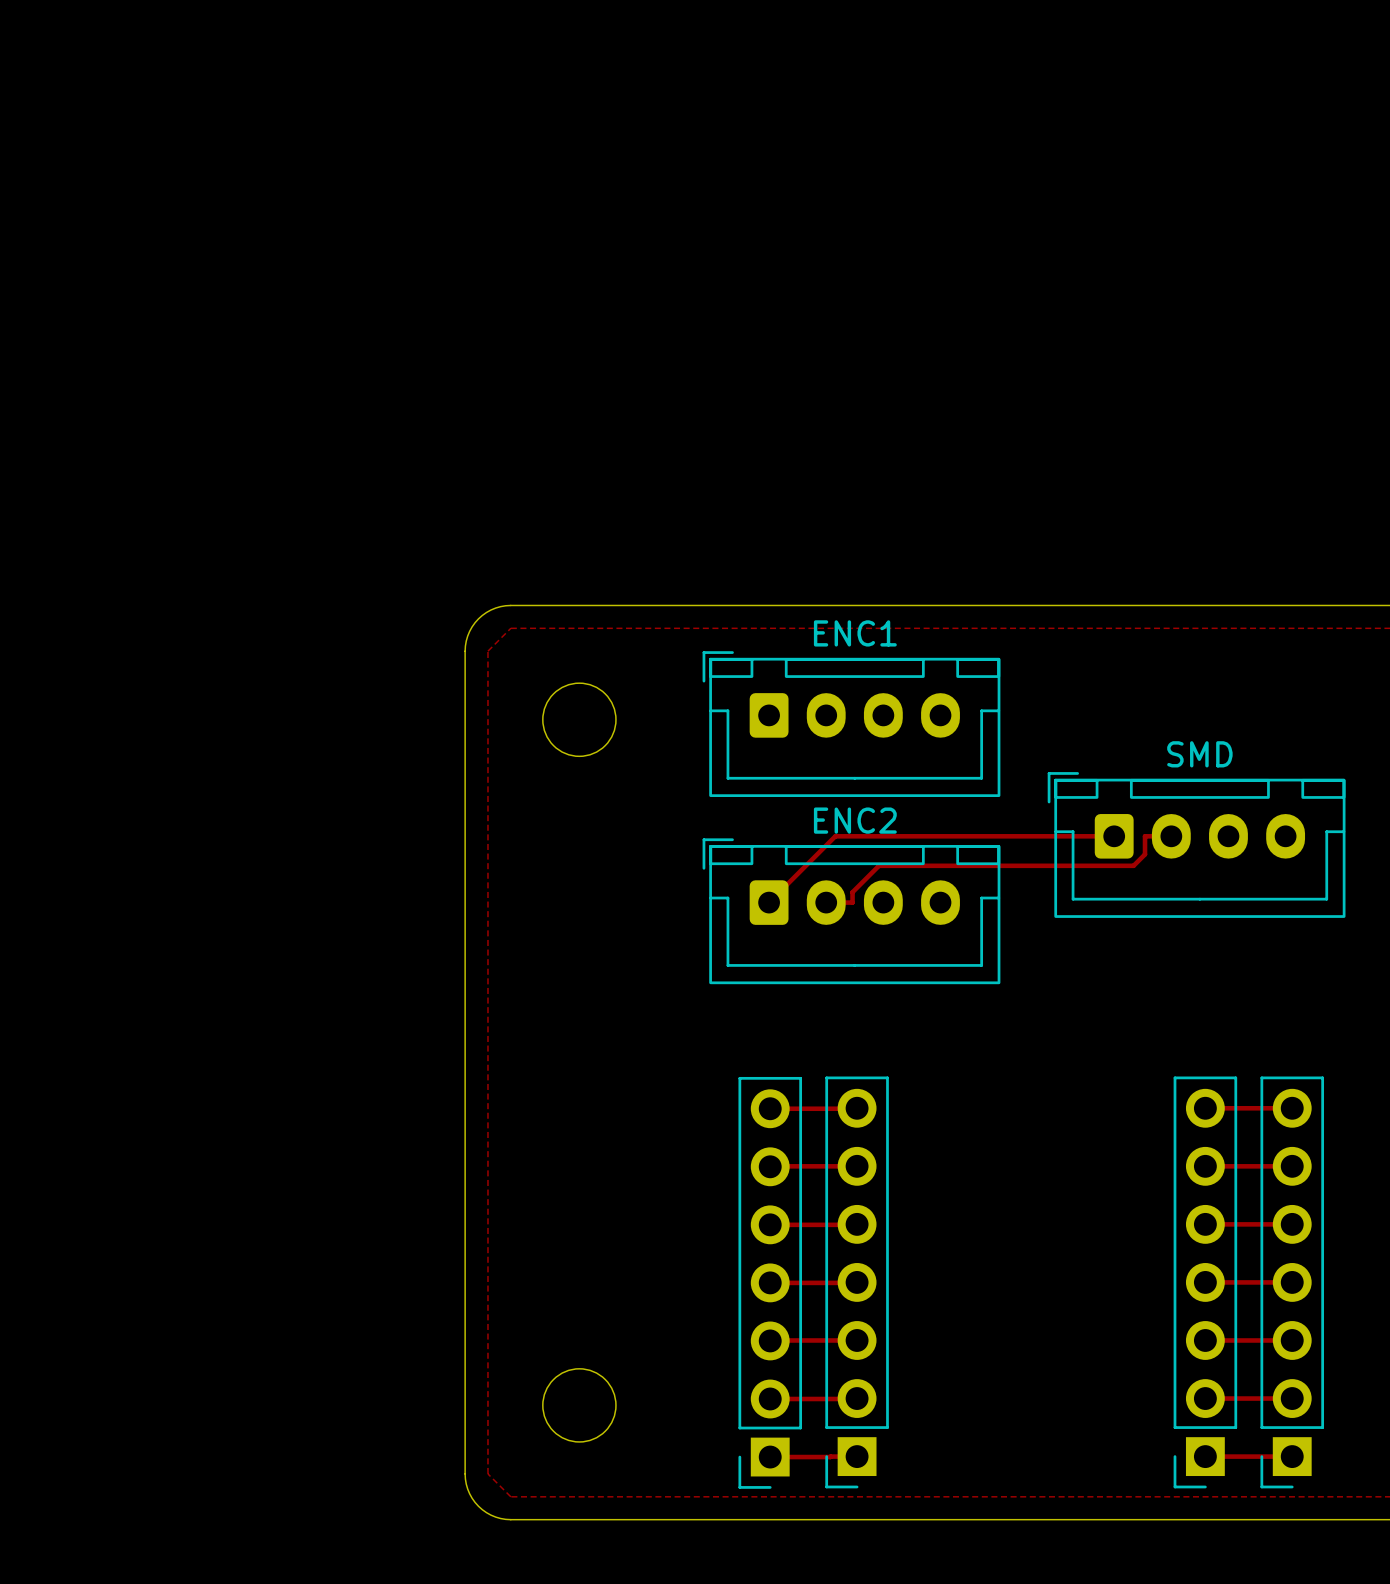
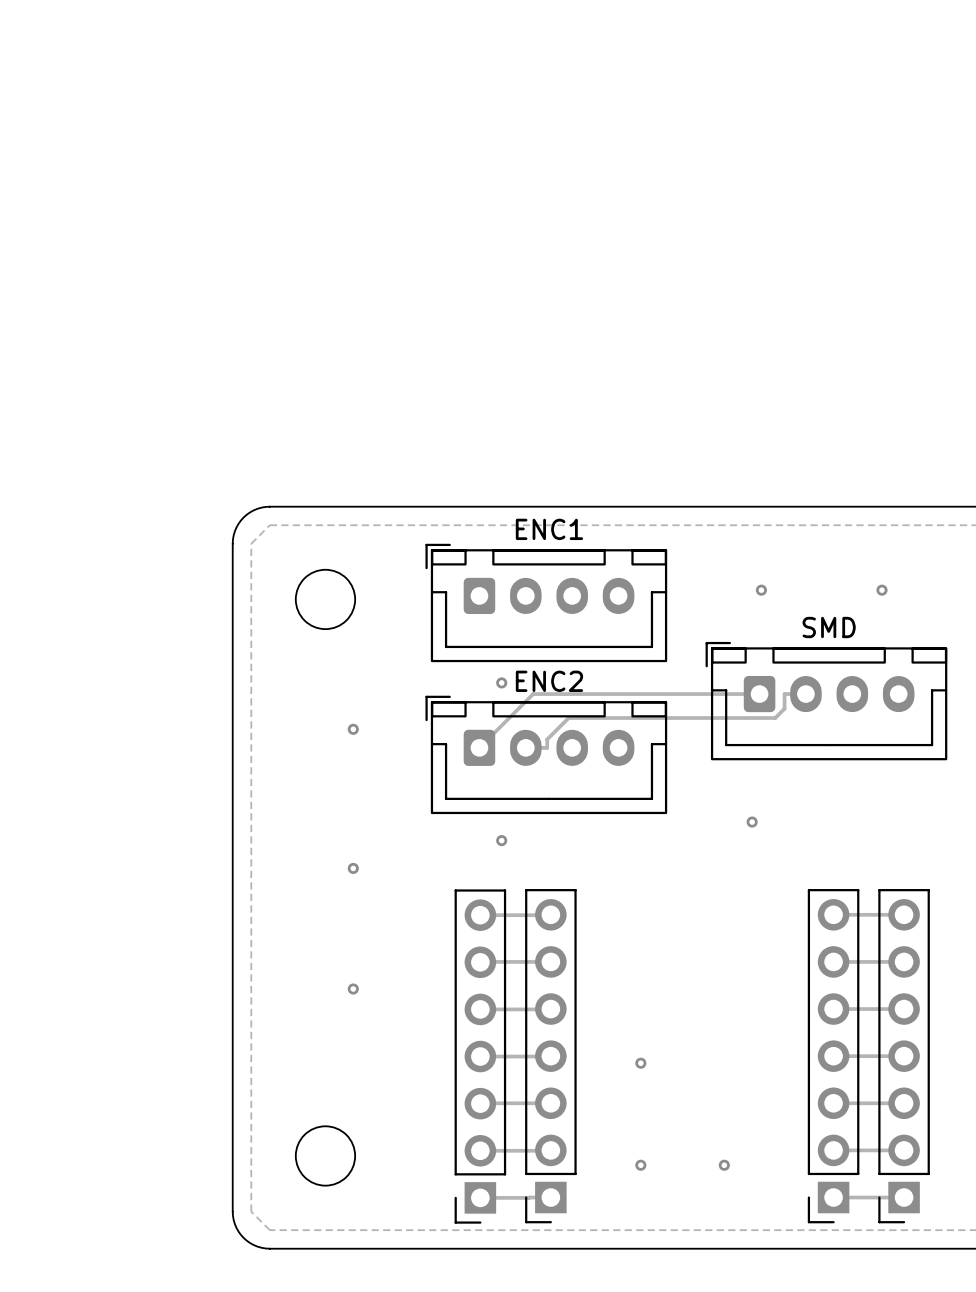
via: none -> (761, 590)
via: none -> (881, 590)
via: none -> (501, 682)
via: none -> (353, 729)
via: none -> (752, 822)
via: none -> (501, 840)
via: none -> (353, 868)
via: none -> (353, 989)
via: none -> (640, 1063)
via: none -> (640, 1165)
via: none -> (724, 1165)

